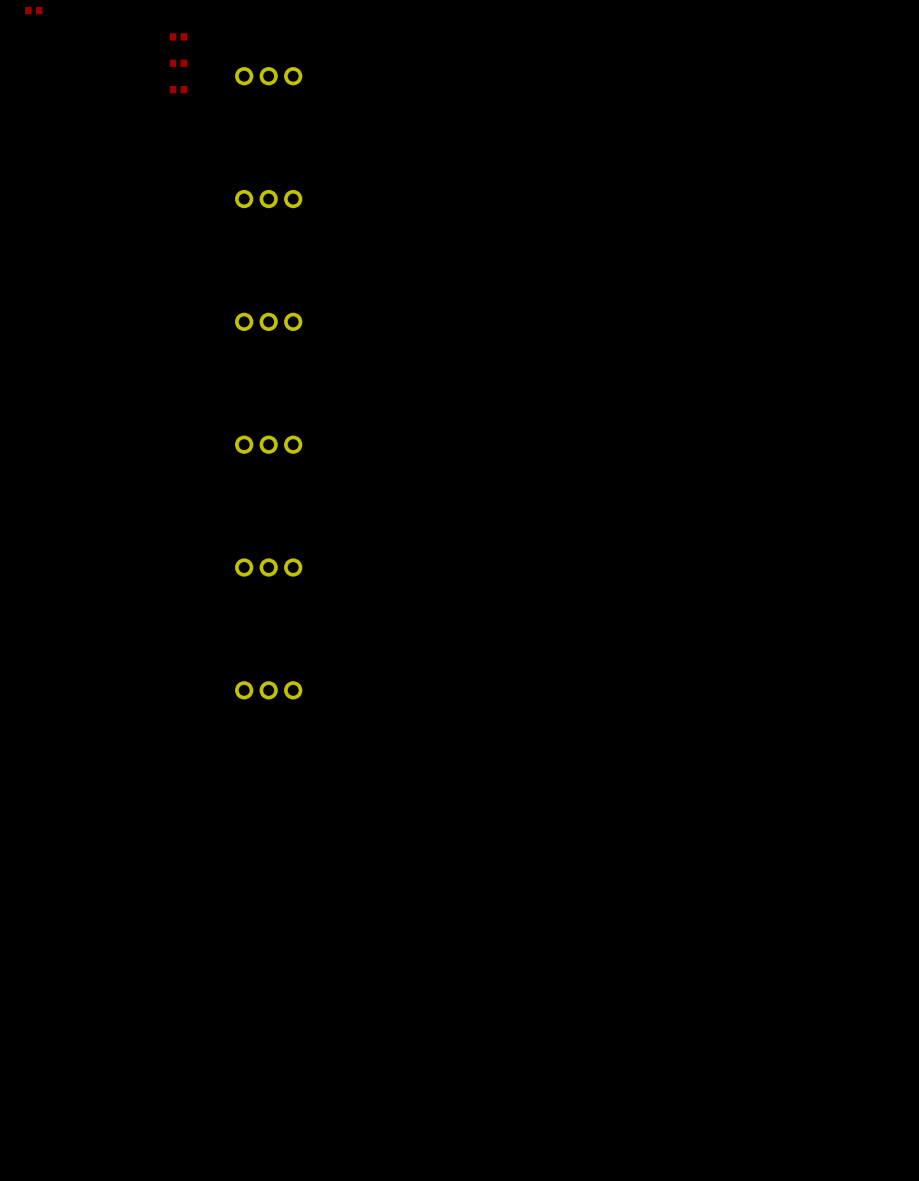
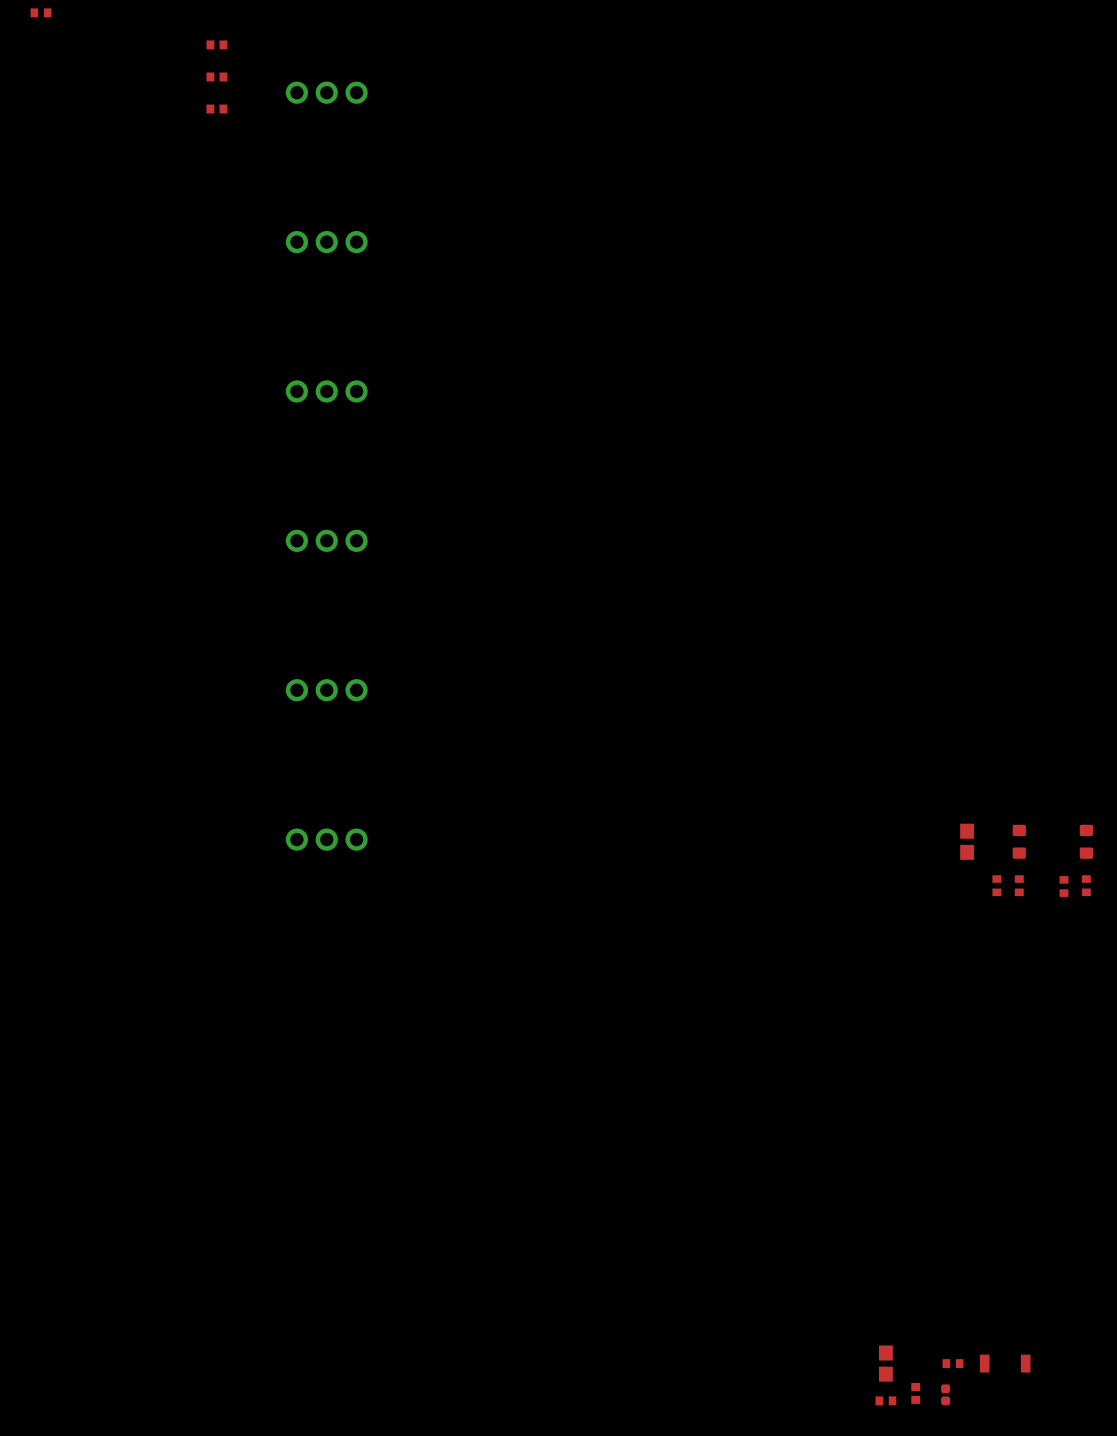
part: none -> (967, 841)
part: none -> (1019, 841)
part: none -> (1086, 841)
part: none -> (996, 885)
part: none -> (1019, 885)
part: none -> (1064, 886)
part: none -> (1086, 885)
part: none -> (885, 1363)
part: none -> (953, 1363)
part: none -> (1005, 1363)
part: none -> (915, 1393)
part: none -> (945, 1394)
part: none -> (885, 1400)

